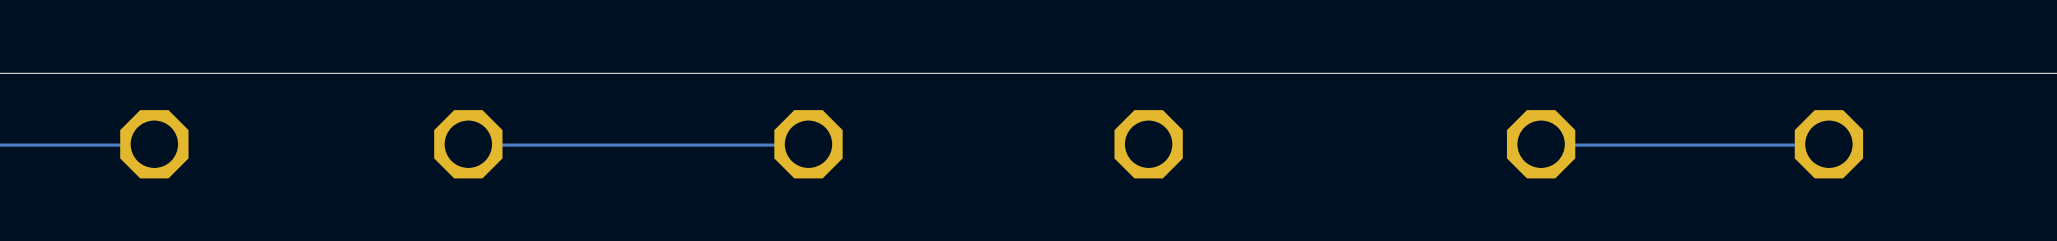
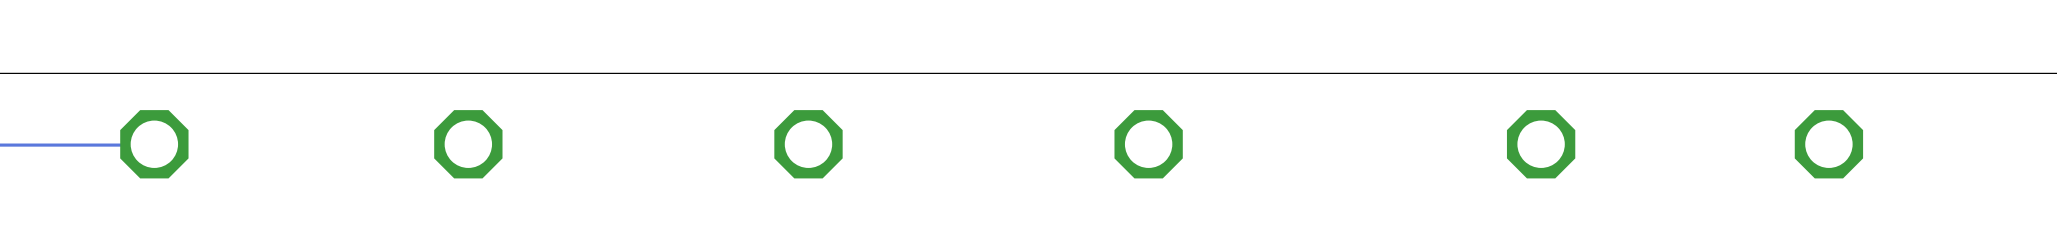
track: (808, 144) (468, 144) -> none
track: (1828, 144) (1541, 144) -> none

